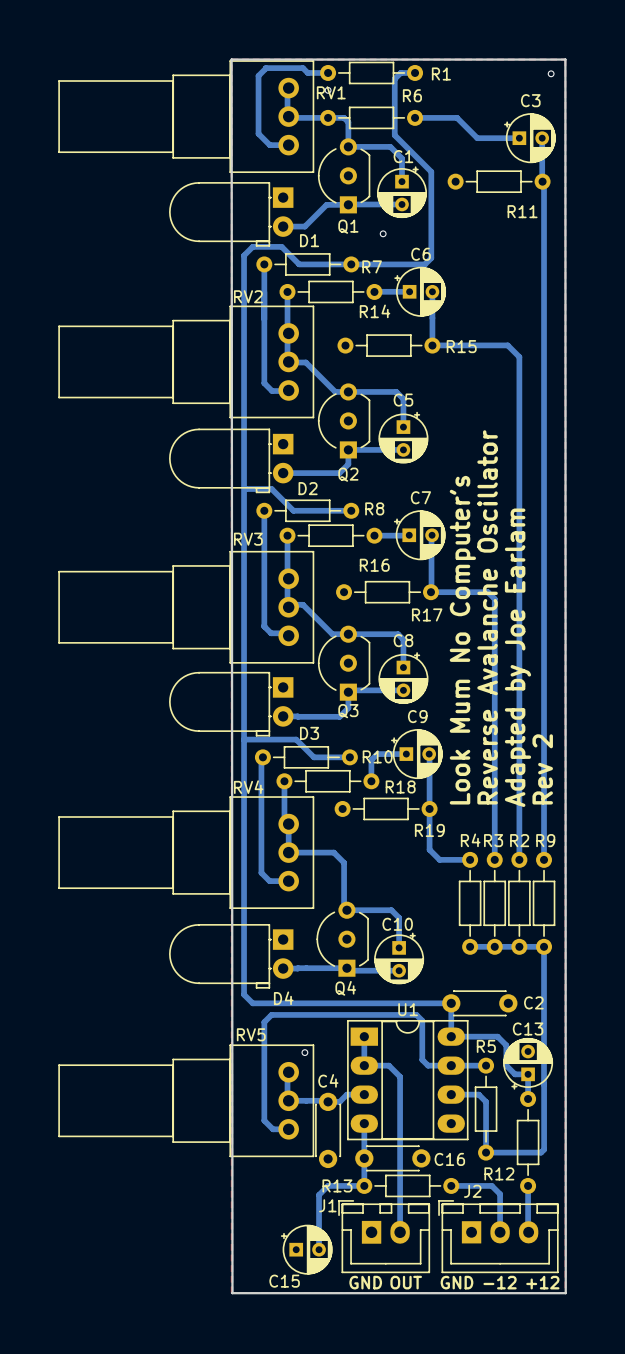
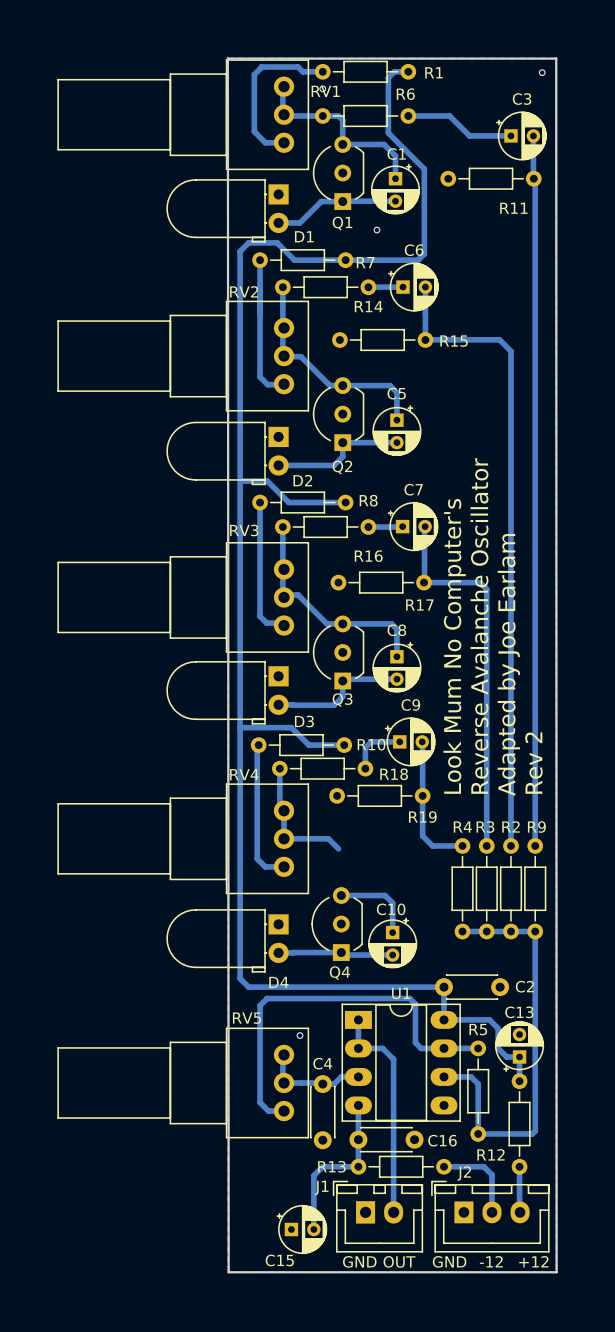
bottom track: (344, 862) (344, 911) -> none

